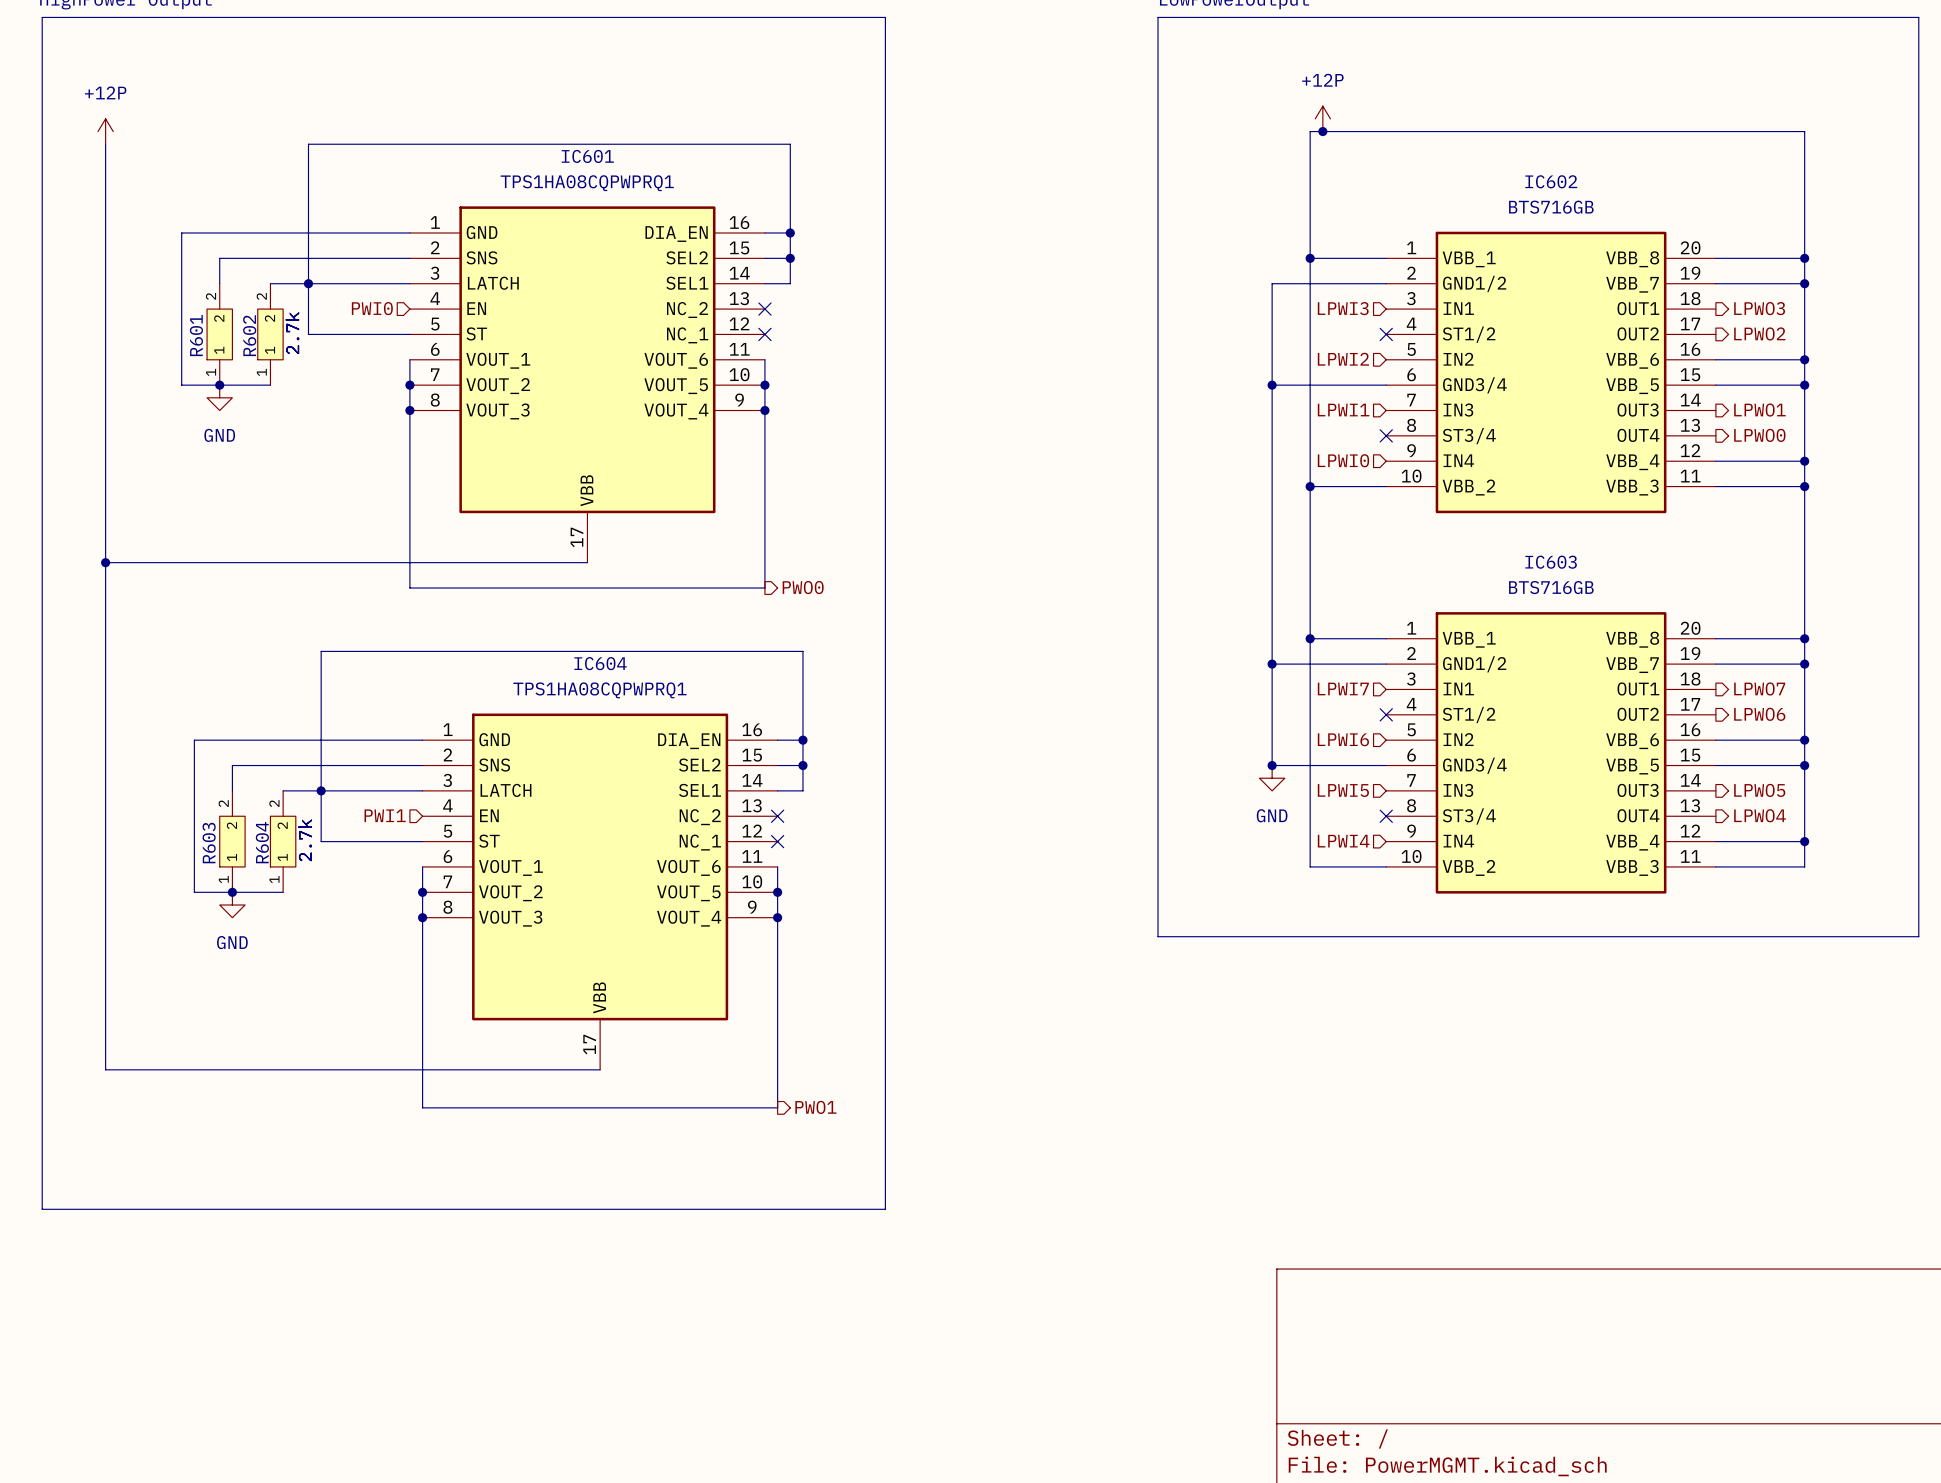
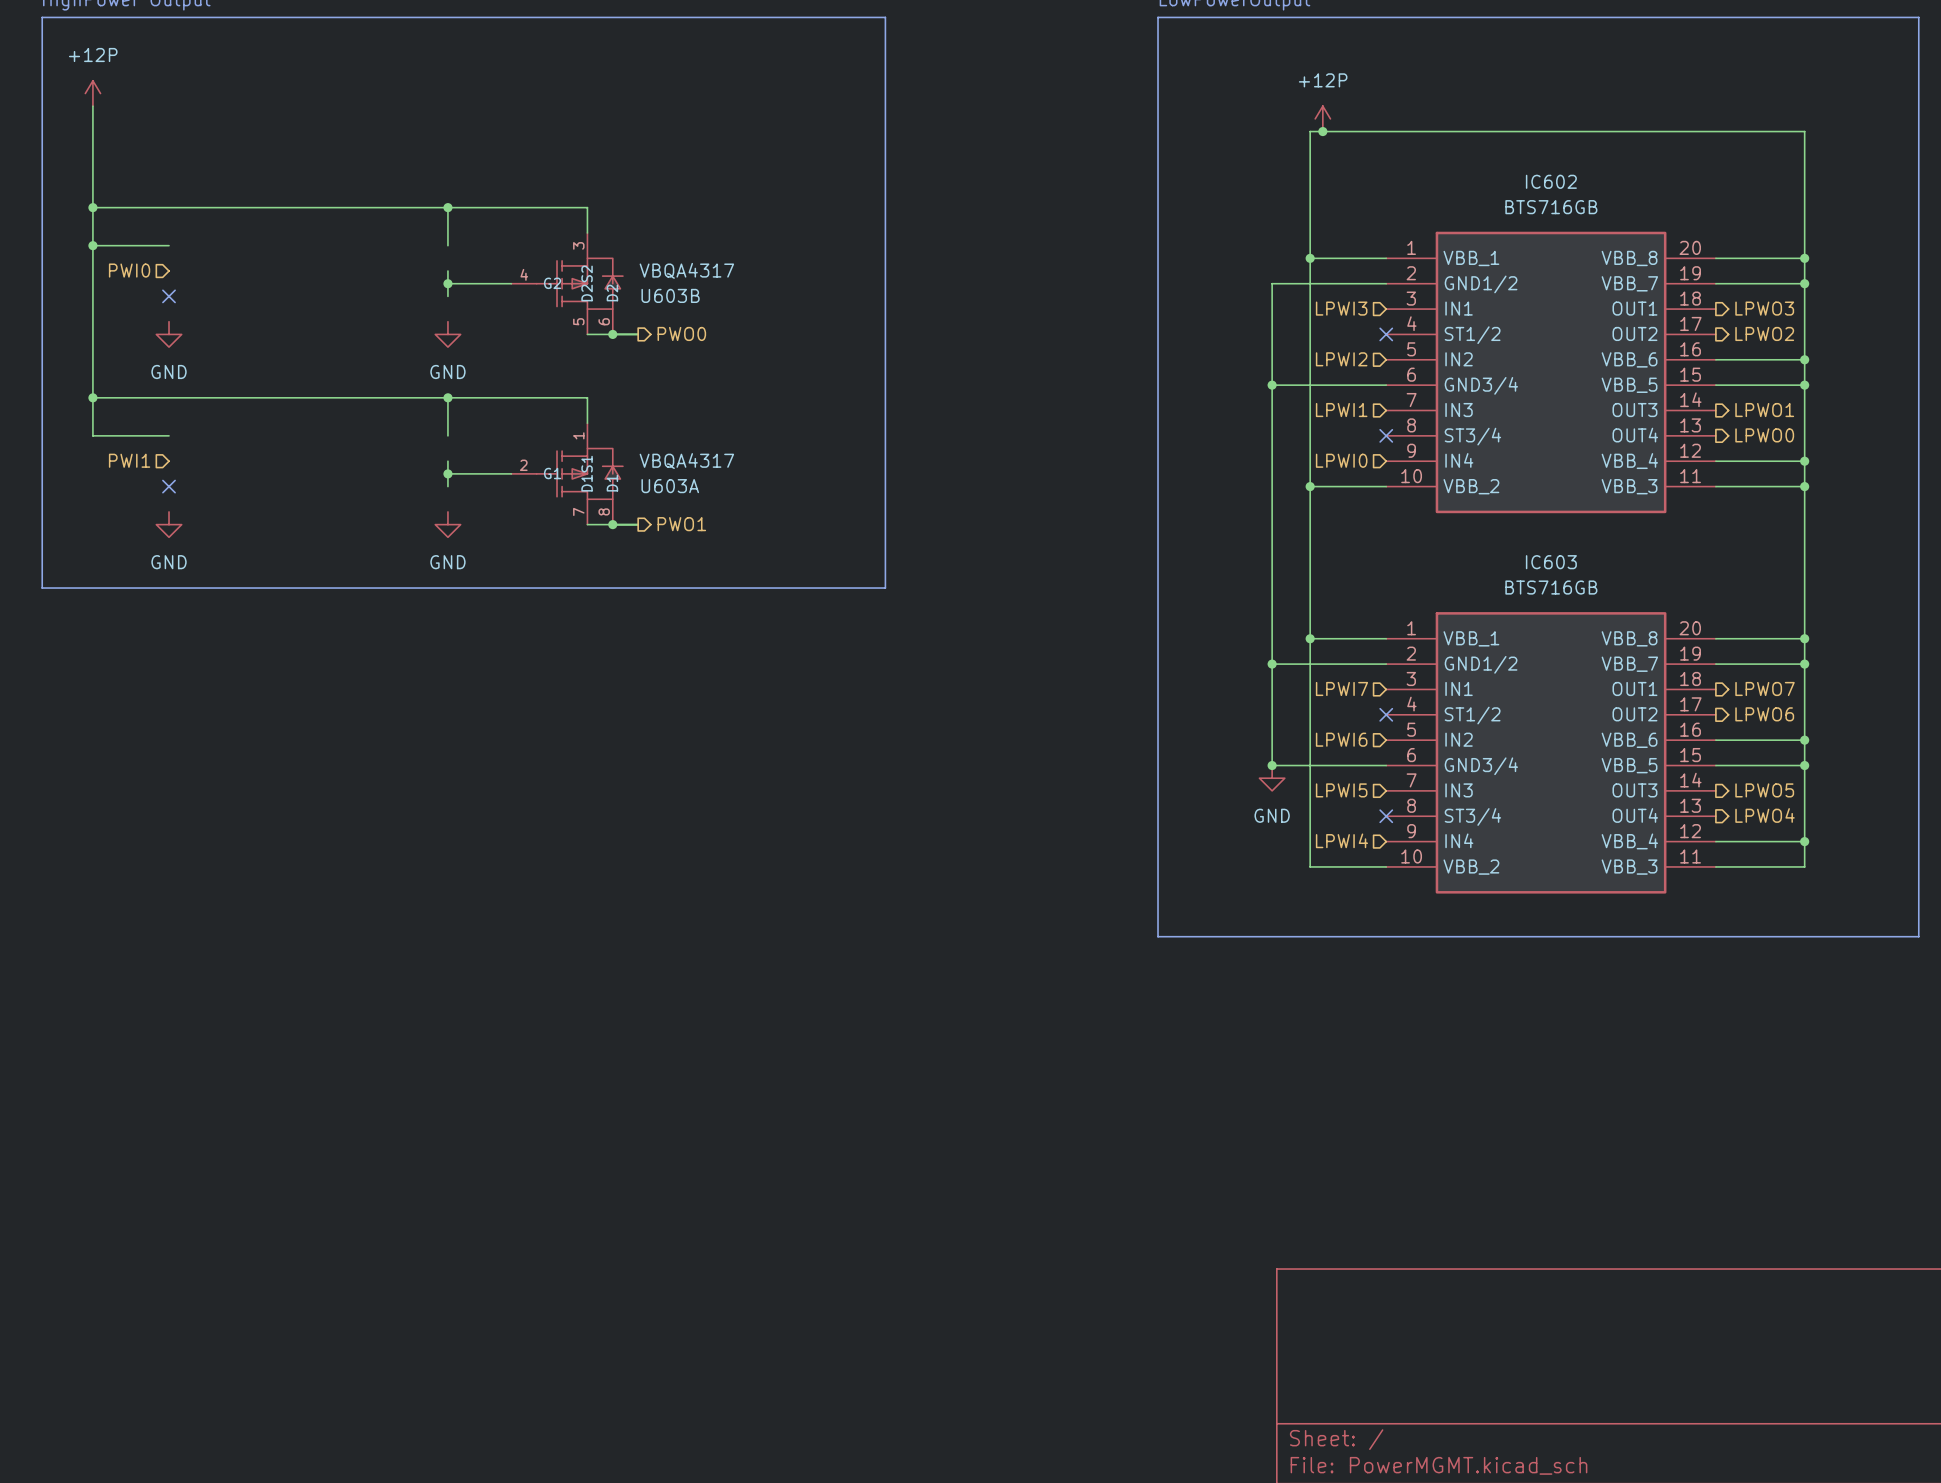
wire: none -> (92, 106) (92, 435) (169, 435)
power symbol position: +12P (105, 131) -> +12P (92, 93)
wire: (105, 144) (105, 1069) (600, 1069) -> none
wire: none -> (92, 207) (587, 207) (587, 232)
junction: none -> (92, 207)
wire: none -> (447, 207) (447, 245)
junction: none -> (447, 207)
wire: (409, 232) (181, 232) (181, 385) (270, 385) -> none
wire: (764, 232) (790, 232) -> none
junction: (790, 232) -> none
wire: none -> (92, 245) (169, 245)
junction: none -> (92, 245)
wire: (409, 258) (219, 258) (219, 283) -> none
wire: (764, 258) (790, 258) -> none
junction: (790, 258) -> none
wire: none -> (447, 271) (447, 296)
wire: (270, 283) (409, 283) -> none
junction: (308, 283) -> none
junction: none -> (447, 283)
U603B: none -> VBQA4317 (567, 283)
wire: (764, 283) (790, 283) (790, 144) (308, 144) (308, 334) (409, 334) -> none
no-connect mark: none -> (169, 296)
hierarchical label position: PWI0 (372, 308) -> PWI0 (129, 270)
no-connect mark: (764, 309) -> none
hierarchical label: none -> PWO0 (681, 333)
power symbol: none -> GND (169, 334)
R601: 2.7k (219, 334) -> none
R602: 2.7k (270, 334) -> none
power symbol: none -> GND (447, 334)
junction: none -> (612, 334)
no-connect mark: (764, 334) -> none
wire: (409, 359) (409, 588) (764, 588) (764, 359) -> none
IC601: TPS1HA08CQPWPRQ1 (587, 384) -> none
junction: (219, 385) -> none
junction: (409, 385) -> none
junction: (764, 385) -> none
wire: none -> (92, 397) (587, 397) (587, 423)
junction: none -> (92, 397)
power symbol: GND (219, 397) -> none
wire: none -> (447, 397) (447, 435)
junction: none -> (447, 397)
junction: (409, 410) -> none
junction: (764, 410) -> none
hierarchical label: none -> PWI1 (129, 460)
wire: none -> (447, 461) (447, 486)
junction: none -> (447, 473)
U603A: none -> VBQA4317 (567, 473)
no-connect mark: none -> (169, 486)
power symbol: none -> GND (169, 524)
power symbol: none -> GND (447, 524)
wire: none -> (587, 524) (638, 524)
junction: none -> (612, 524)
hierarchical label: none -> PWO1 (681, 524)
wire: (105, 562) (587, 562) -> none
junction: (105, 562) -> none
hierarchical label: PWO0 (803, 587) -> none
line: (42, 588) (42, 1209) (885, 1209) (885, 588) -> (42, 588) (885, 588)
wire: (422, 740) (194, 740) (194, 892) (283, 892) -> none
wire: (777, 740) (802, 740) -> none
junction: (802, 740) -> none
wire: (422, 765) (232, 765) (232, 790) -> none
wire: (777, 765) (802, 765) -> none
junction: (802, 765) -> none
wire: (283, 790) (422, 790) -> none
junction: (321, 790) -> none
wire: (777, 790) (802, 790) (802, 651) (321, 651) (321, 841) (422, 841) -> none
hierarchical label: PWI1 (385, 815) -> none
no-connect mark: (777, 816) -> none
R603: 2.7k (232, 841) -> none
R604: 2.7k (283, 841) -> none
no-connect mark: (777, 841) -> none
wire: (422, 866) (422, 1107) (777, 1107) (777, 866) -> none
IC604: TPS1HA08CQPWPRQ1 (600, 891) -> none
junction: (232, 892) -> none
junction: (422, 892) -> none
junction: (777, 892) -> none
power symbol: GND (232, 905) -> none
junction: (422, 917) -> none
junction: (777, 917) -> none
hierarchical label: PWO1 (815, 1107) -> none

